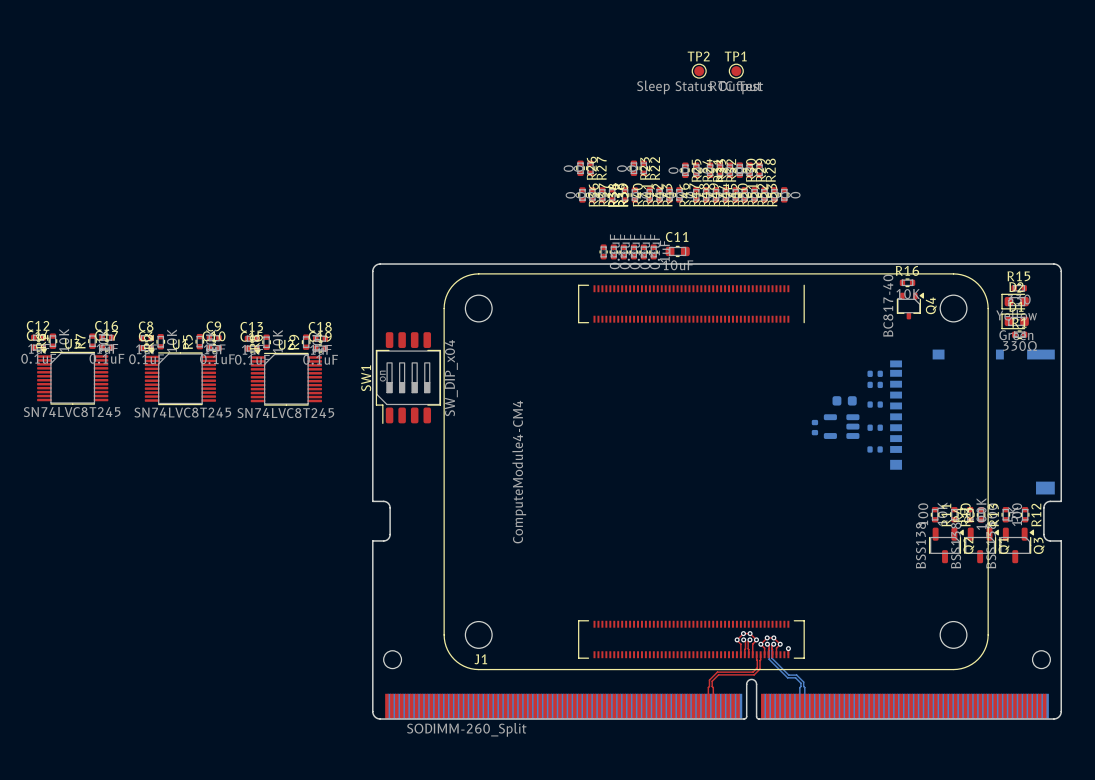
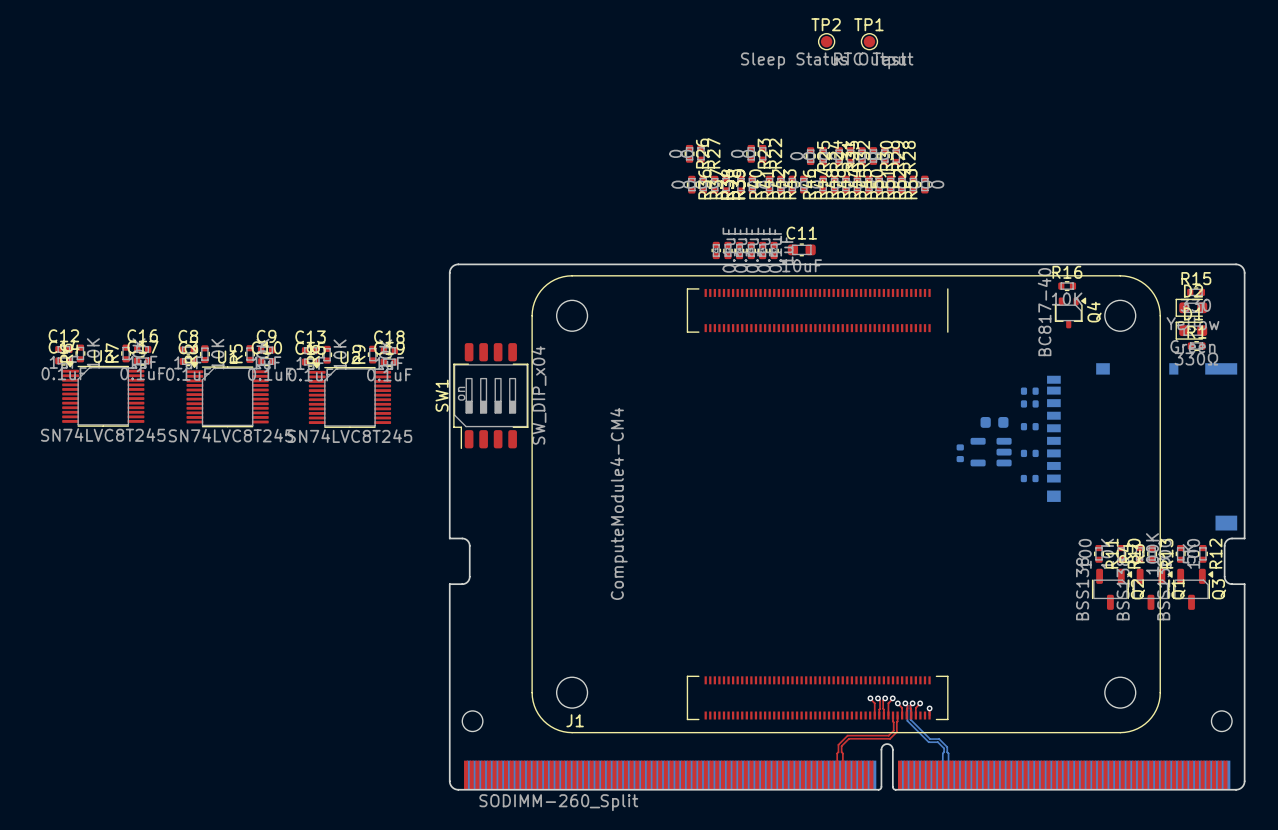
via: (743, 633) -> none
via: (750, 633) -> none
via: (767, 637) -> none
via: (773, 637) -> none
top track: (737, 639) (743, 633) (750, 633) (756, 639) -> none
top track: (760, 644) (767, 637) (773, 637) (780, 644) -> none

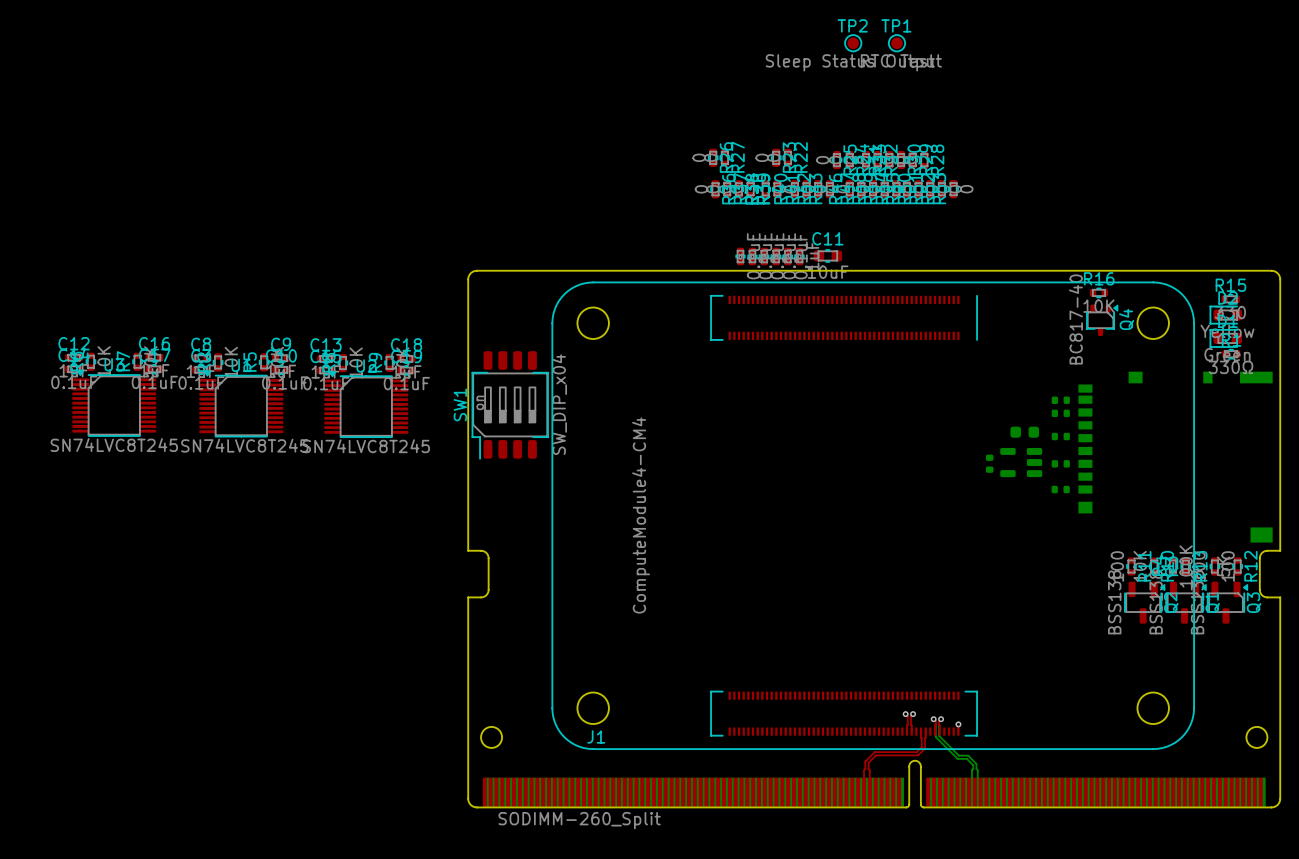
top track: (870, 698) (874, 703) (874, 715) -> none
via: (870, 698) -> none
top track: (892, 698) (888, 703) (888, 715) -> none
via: (892, 698) -> none
top track: (897, 703) (902, 707) (902, 715) -> none
via: (897, 703) -> none
top track: (920, 703) (915, 707) (915, 715) -> none
via: (920, 703) -> none

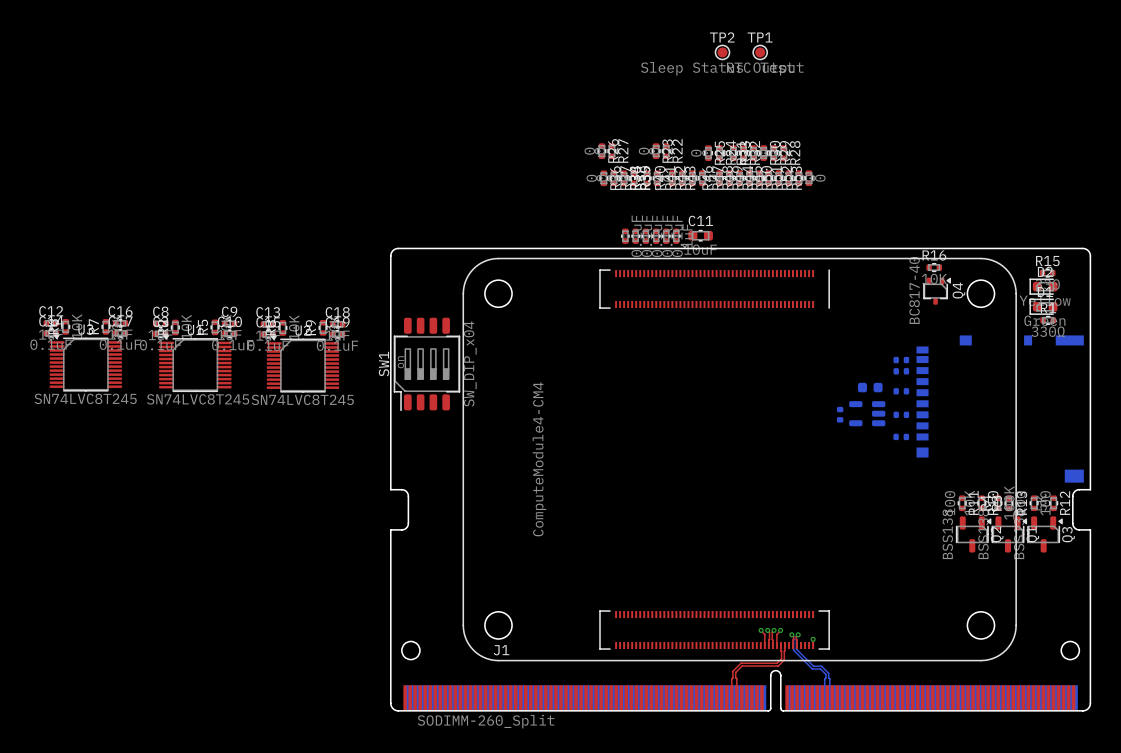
top track: none -> (761, 630) (764, 634) (764, 645)
via: none -> (761, 630)
top track: none -> (780, 630) (776, 634) (776, 645)
via: none -> (780, 630)

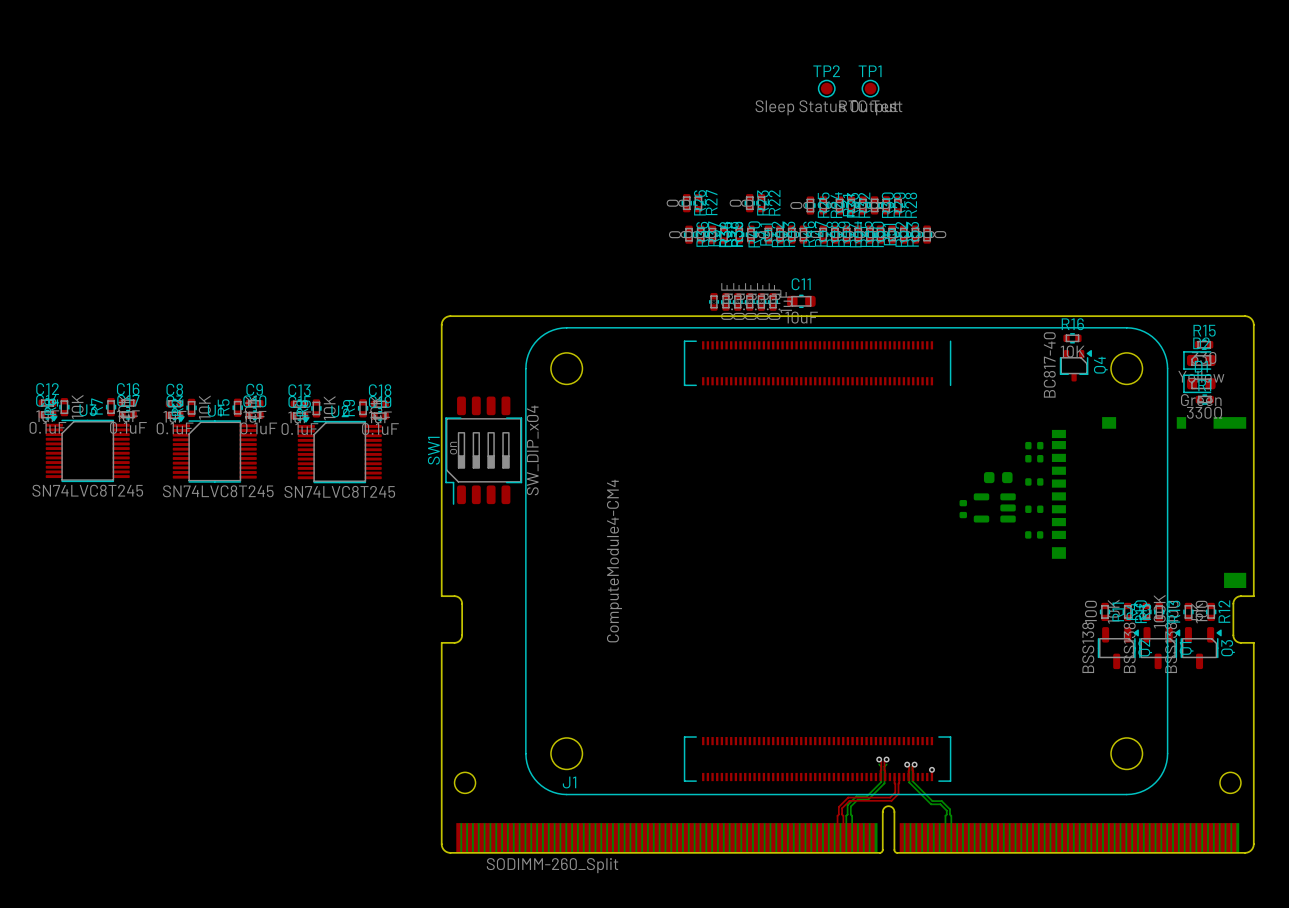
top track: (761, 630) (764, 634) (764, 645) -> none
via: (761, 630) -> none
top track: (780, 630) (776, 634) (776, 645) -> none
via: (780, 630) -> none
bottom track: none -> (879, 764) (881, 766) (881, 782) (866, 796) (856, 796) (847, 805) (846, 837)
bottom track: none -> (886, 764) (884, 766) (884, 783) (868, 799) (857, 799) (850, 806) (852, 837)

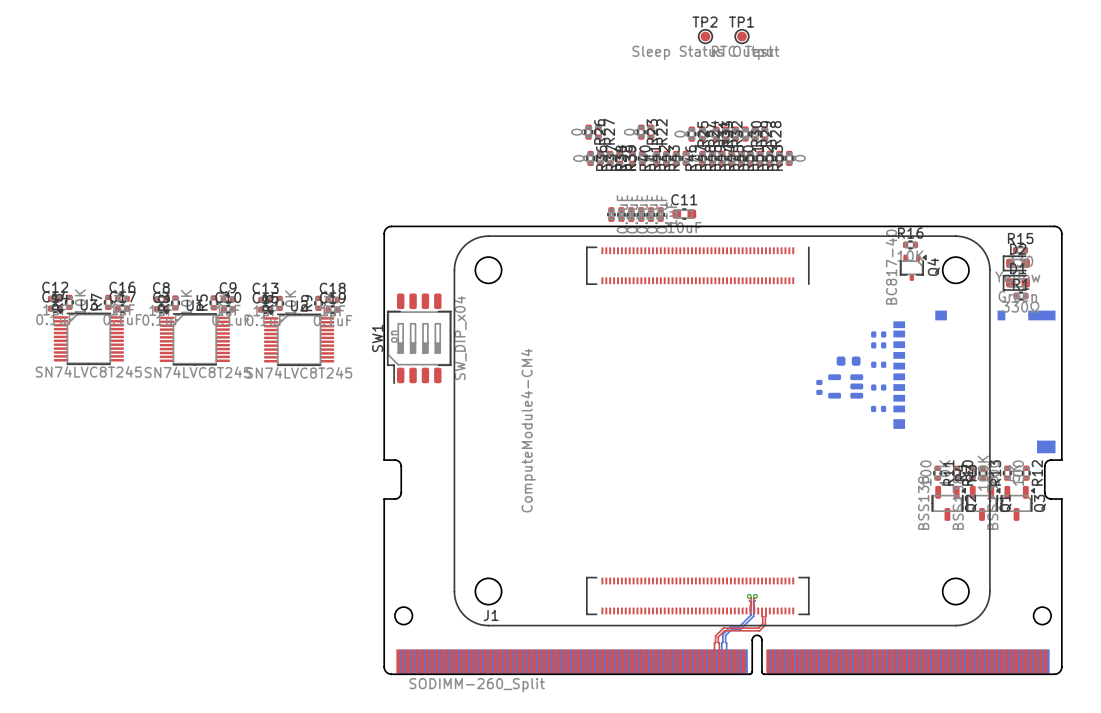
top track: (907, 764) (909, 766) (908, 777) -> none
bottom track: (907, 764) (909, 766) (909, 782) (931, 804) (940, 804) (946, 810) (945, 837) -> none
via: (907, 764) -> none
top track: (914, 764) (912, 766) (913, 777) -> none
bottom track: (914, 764) (912, 766) (912, 781) (932, 801) (941, 801) (950, 809) (951, 837) -> none
via: (914, 764) -> none
via: (931, 769) -> none

